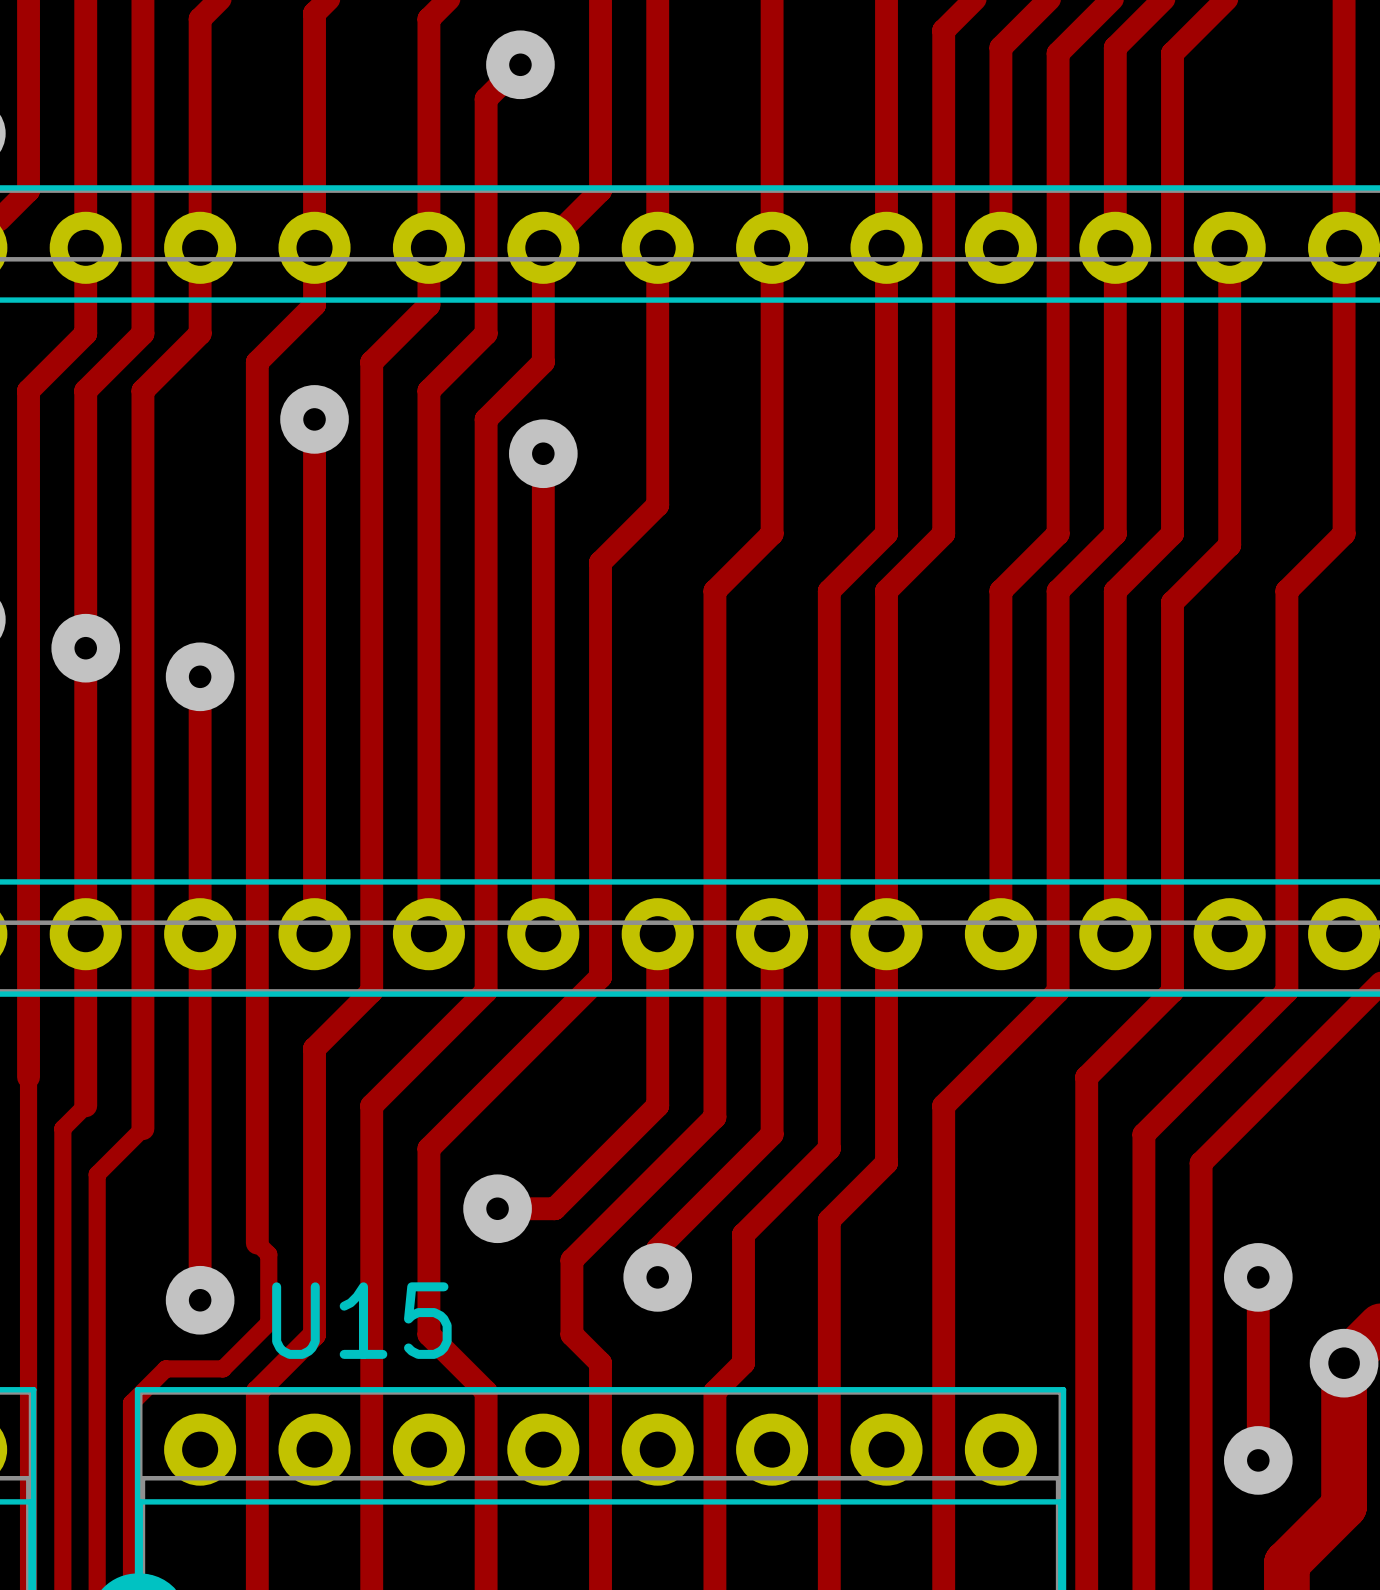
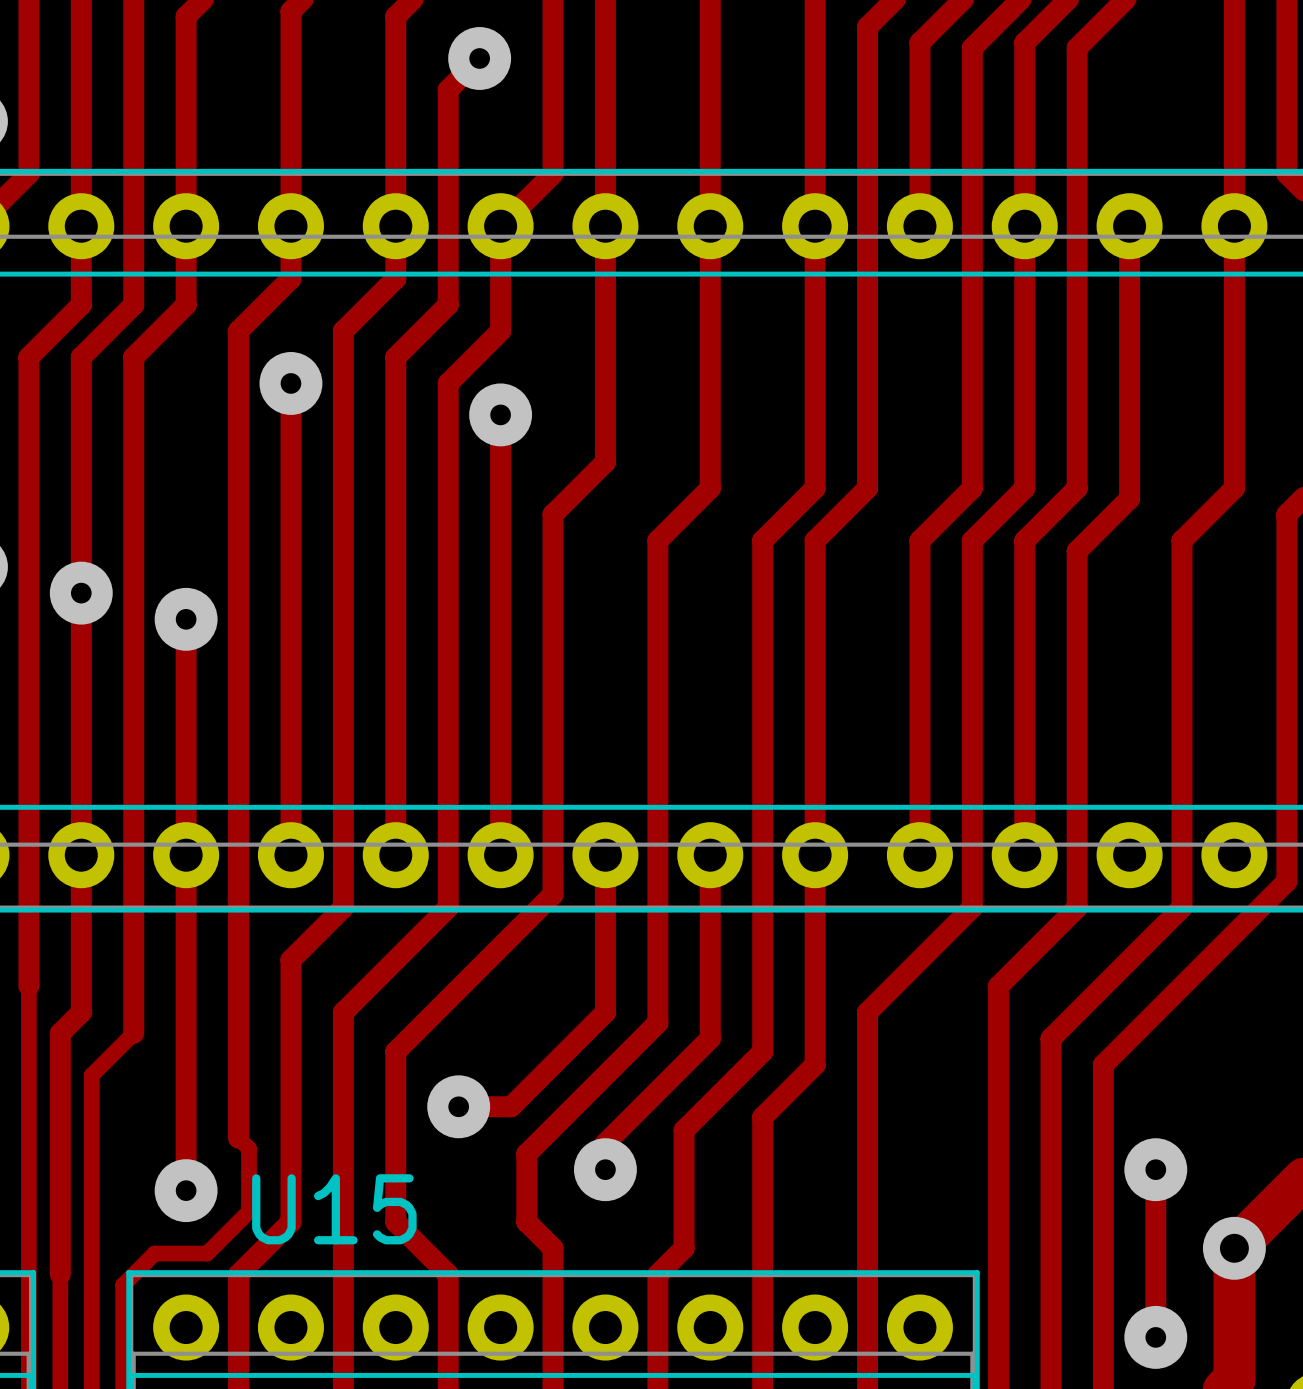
track width: thin (85, 1105) (62, 1128) (62, 1391) -> thick (81, 1012) (60, 1033) (60, 1274)

